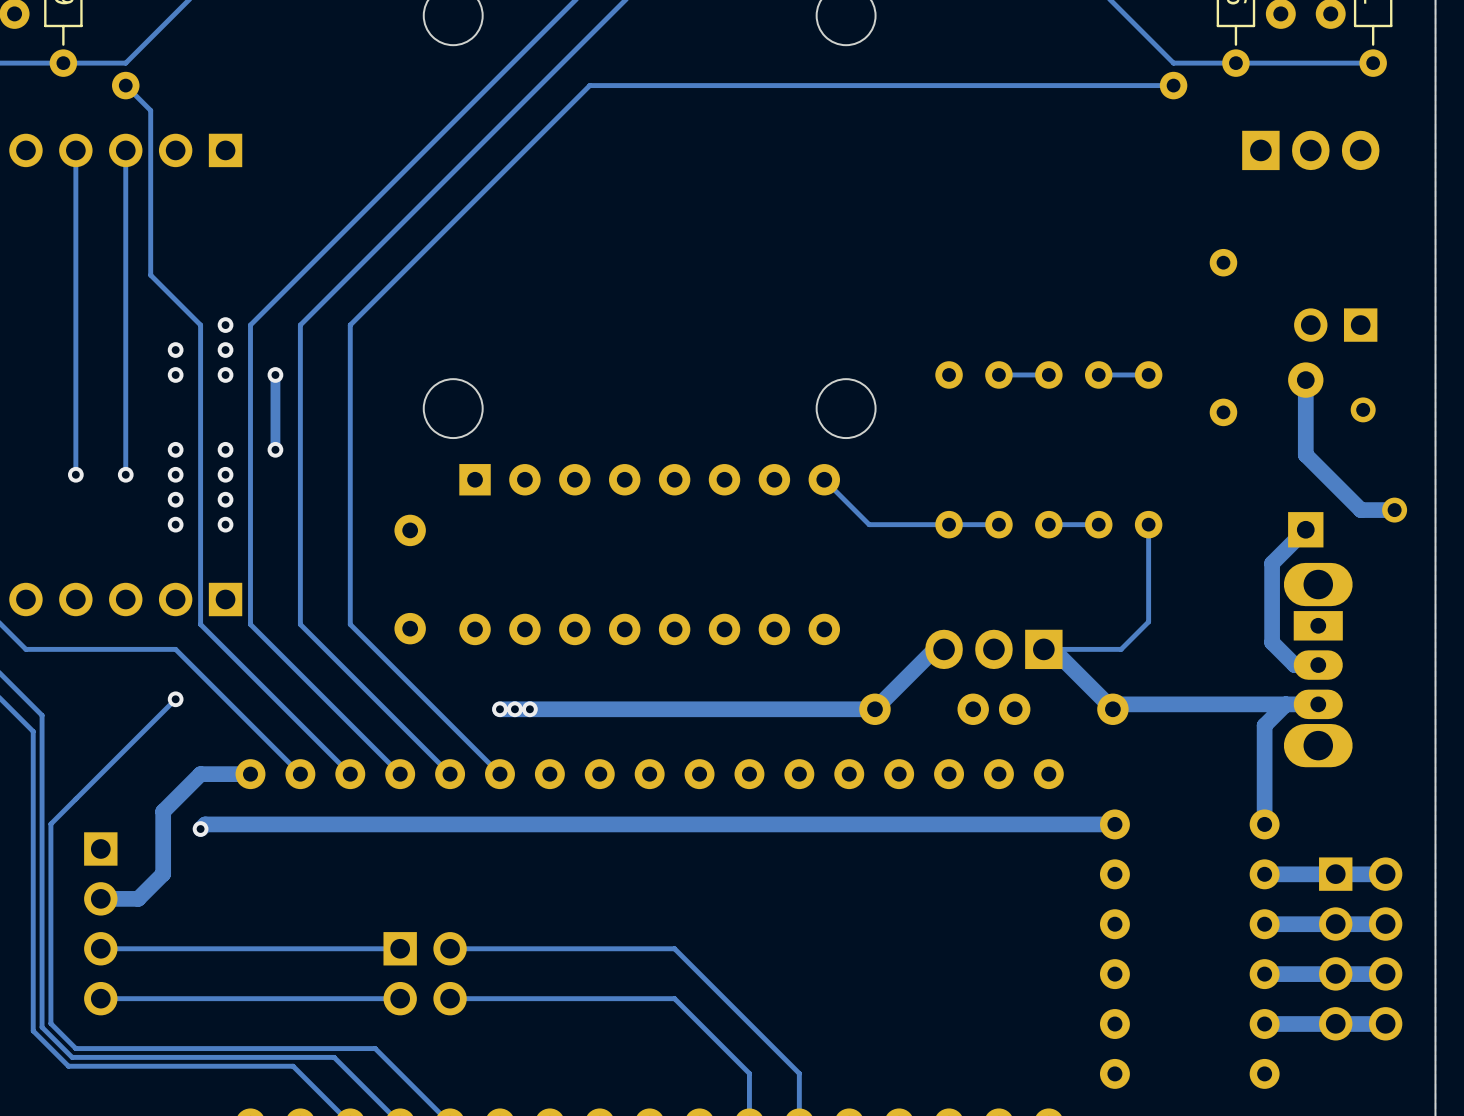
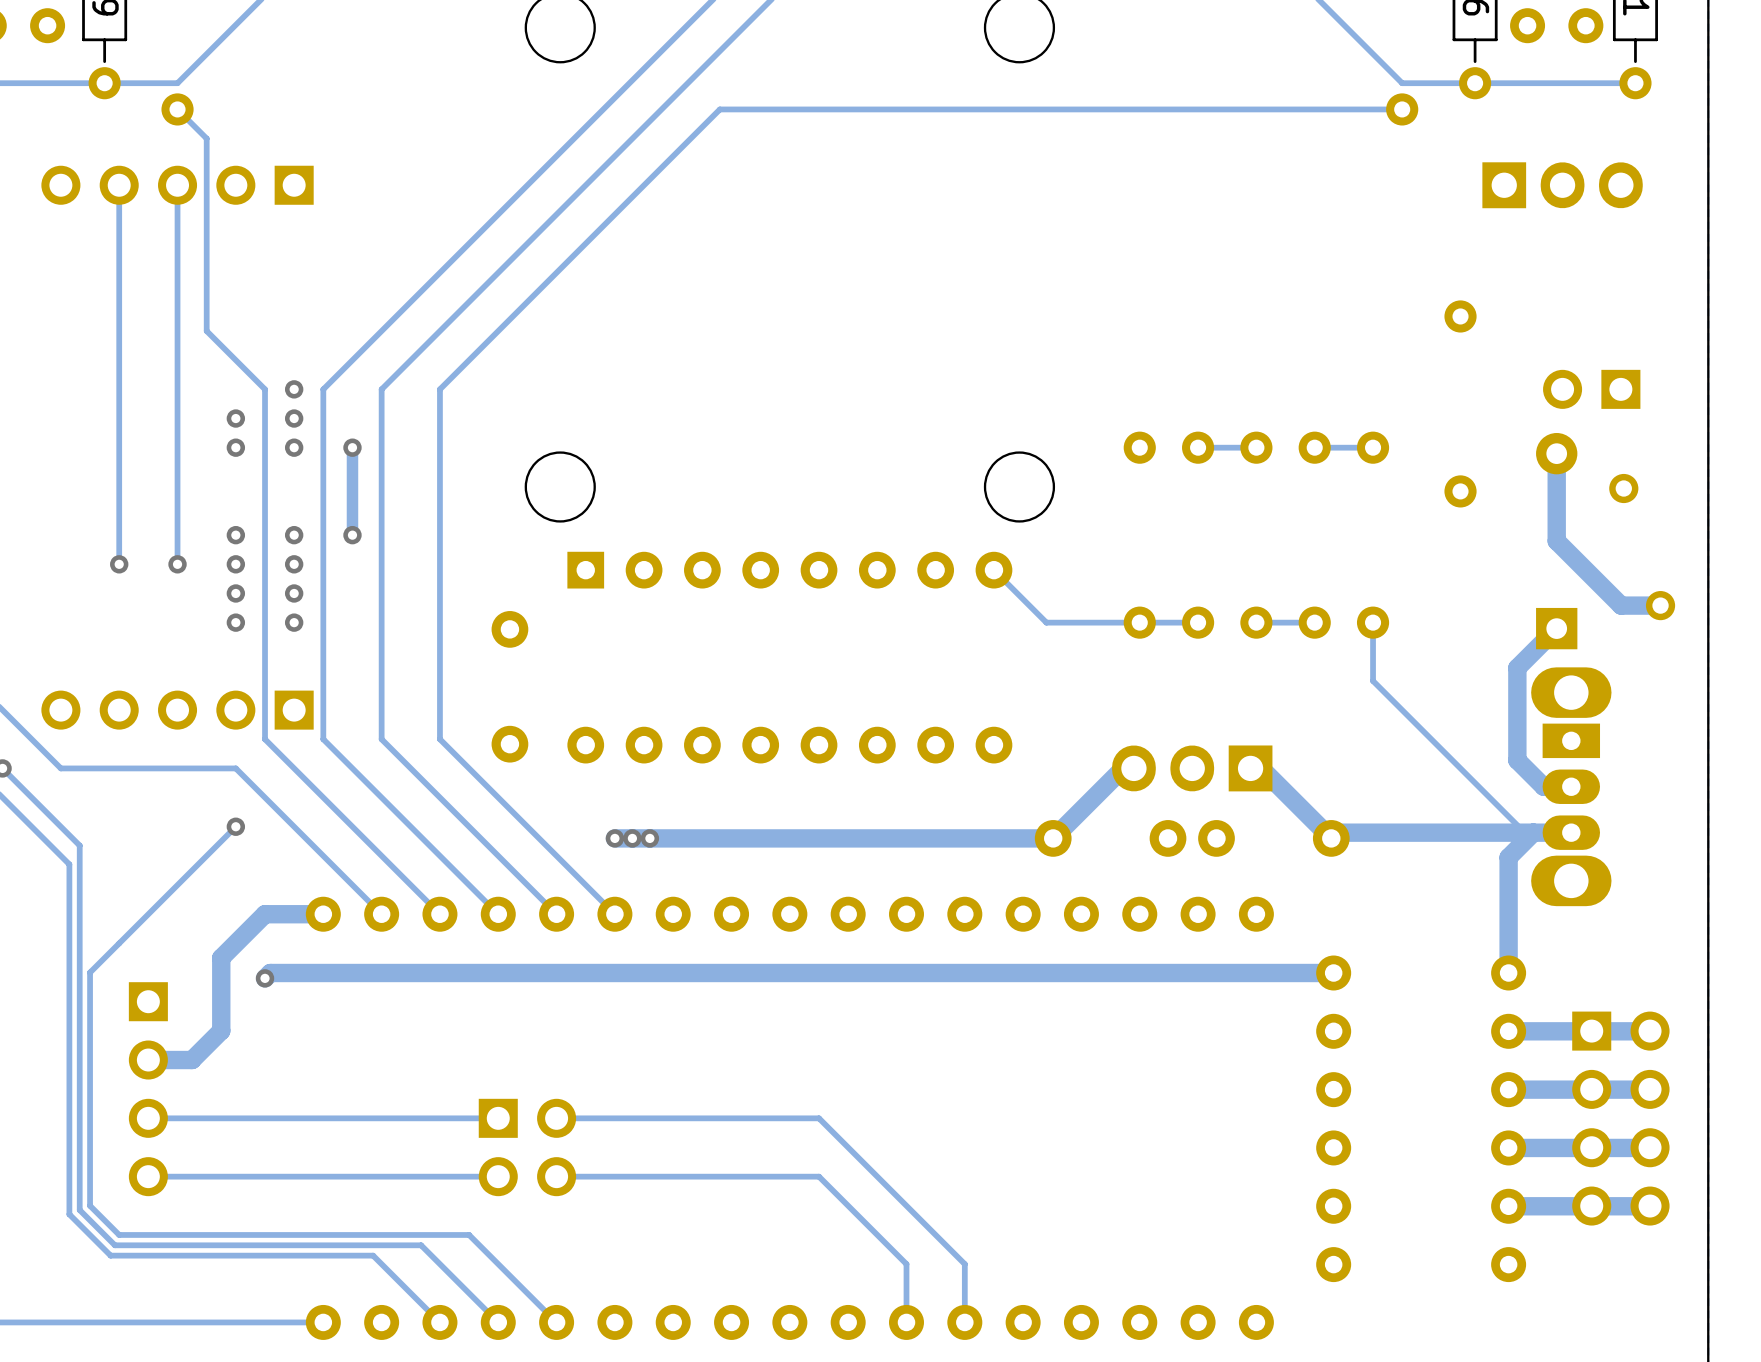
track: (1148, 574) (1148, 621) (1121, 649) (1043, 649) -> (1373, 680) (1524, 832) (1571, 832)

